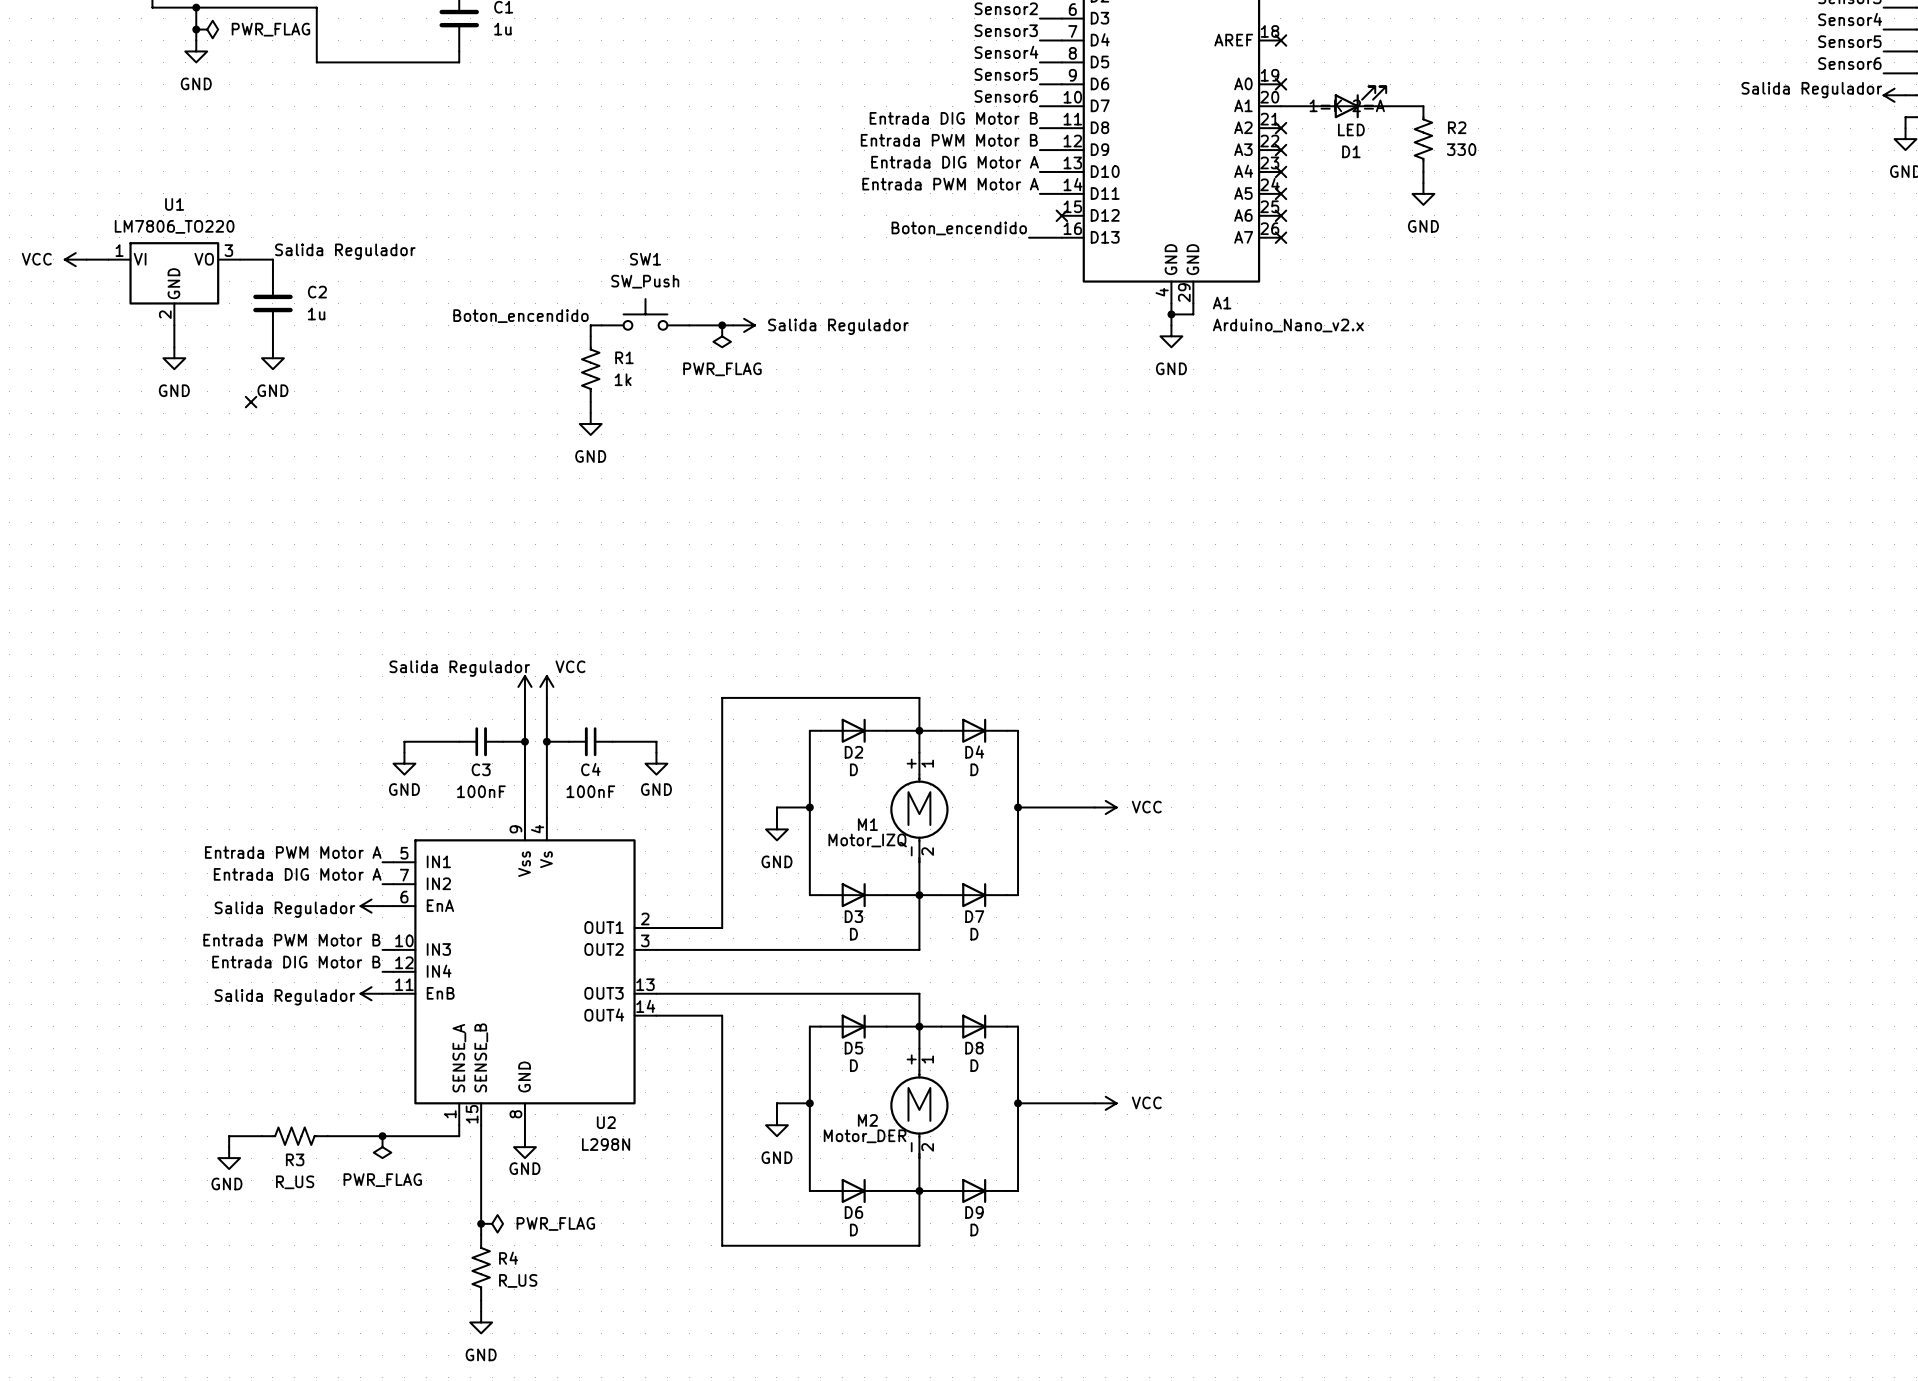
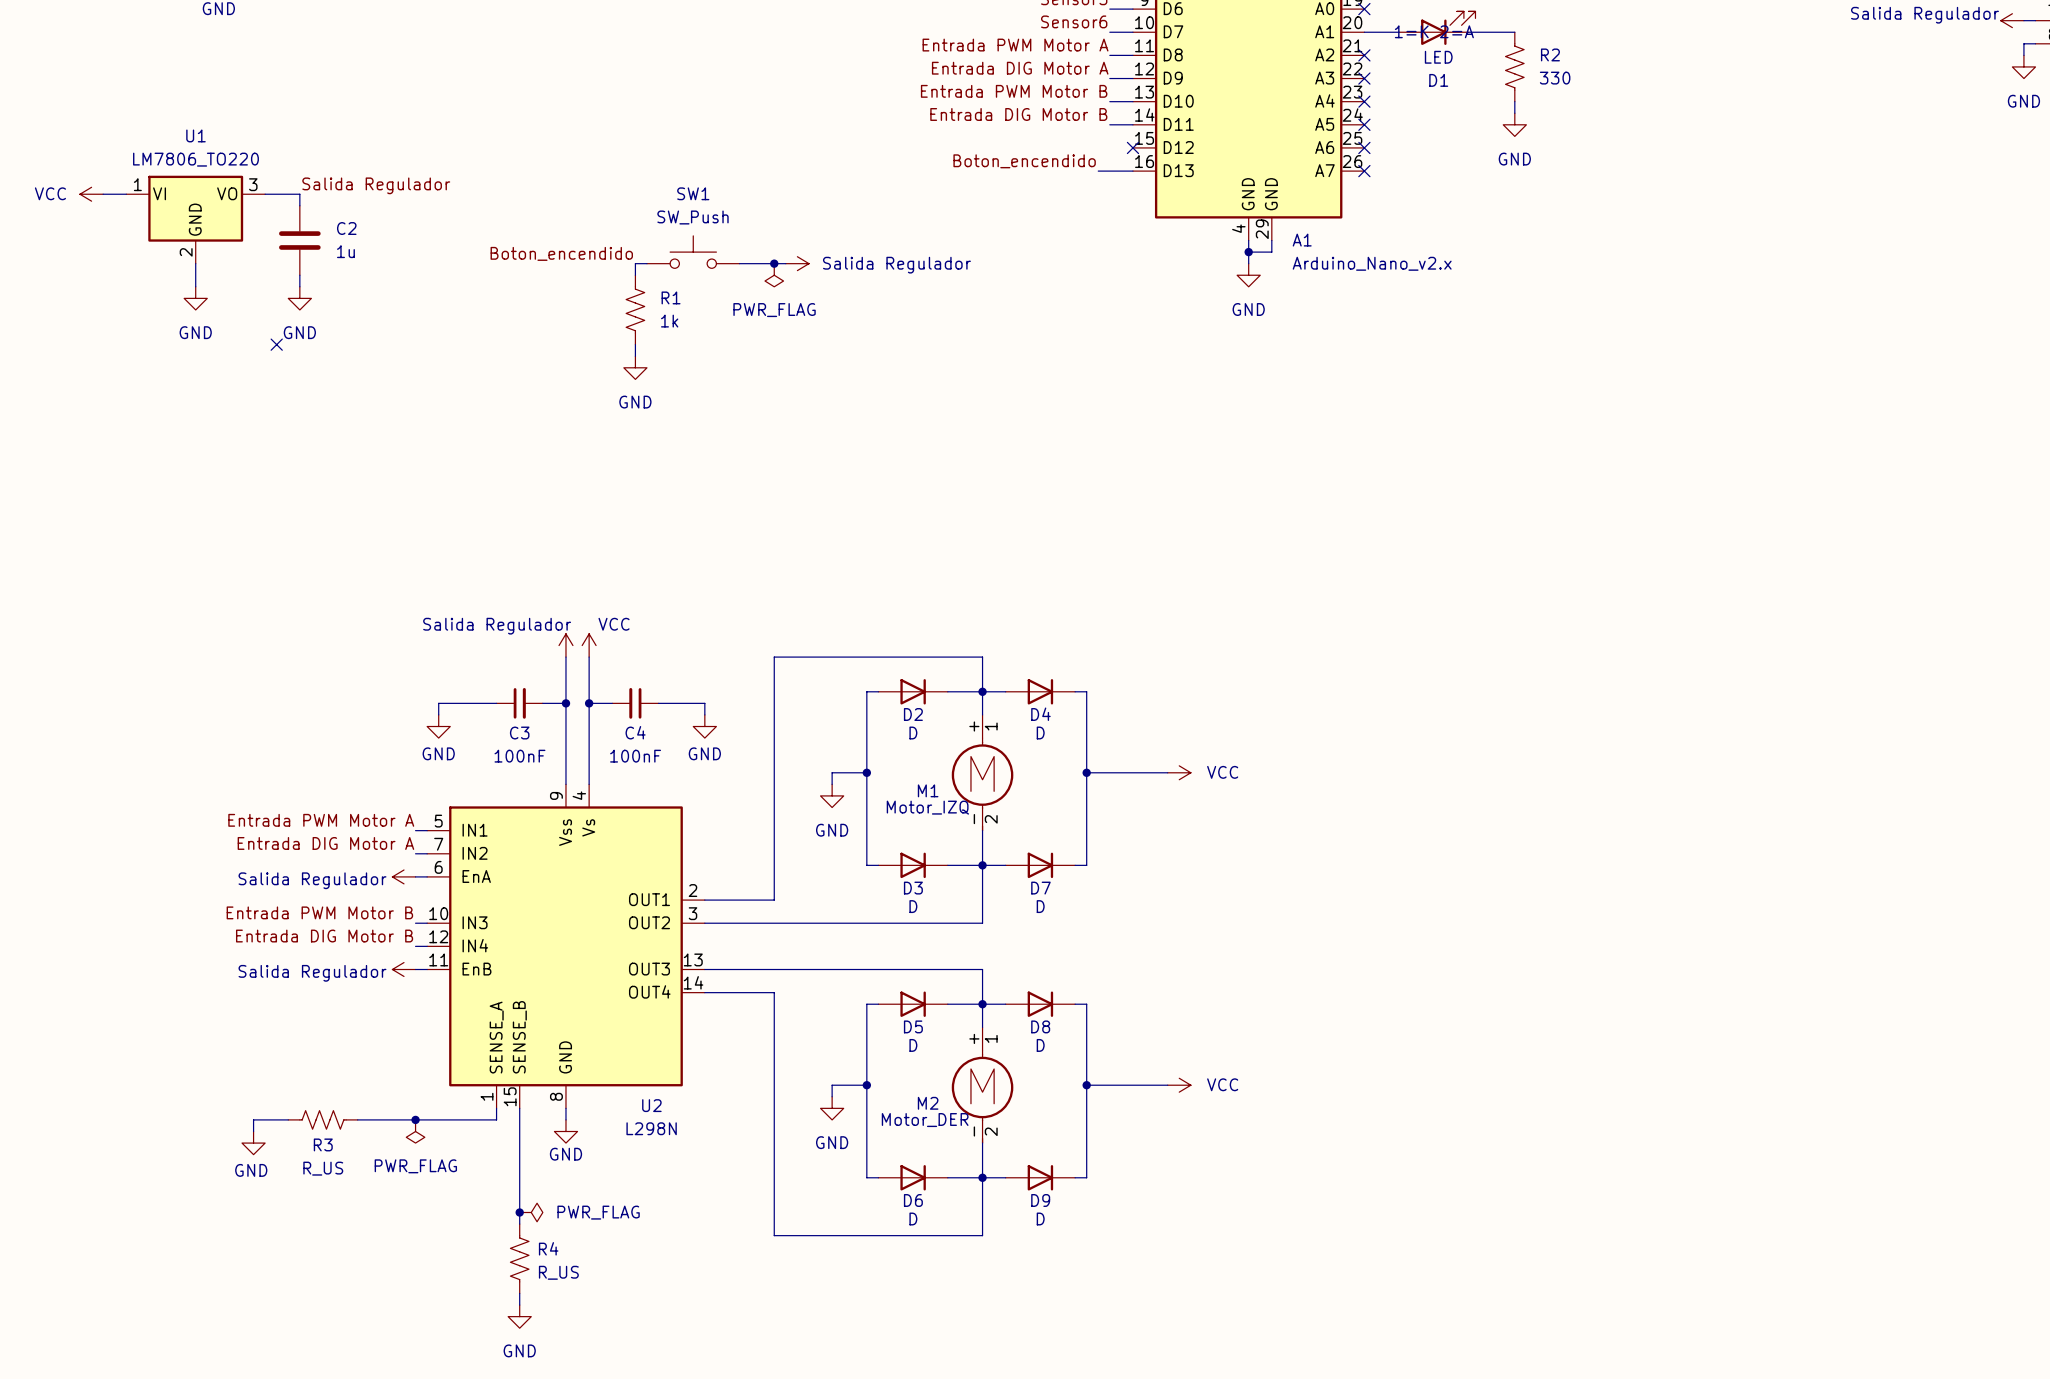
label: Entrada DIG Motor B (953, 118) -> Entrada PWM Motor A (1015, 45)
label: Entrada PWM Motor B (949, 140) -> Entrada DIG Motor A (1020, 68)
label: Entrada DIG Motor A (955, 162) -> Entrada PWM Motor B (1014, 91)
label: Entrada PWM Motor A (950, 184) -> Entrada DIG Motor B (1018, 114)

